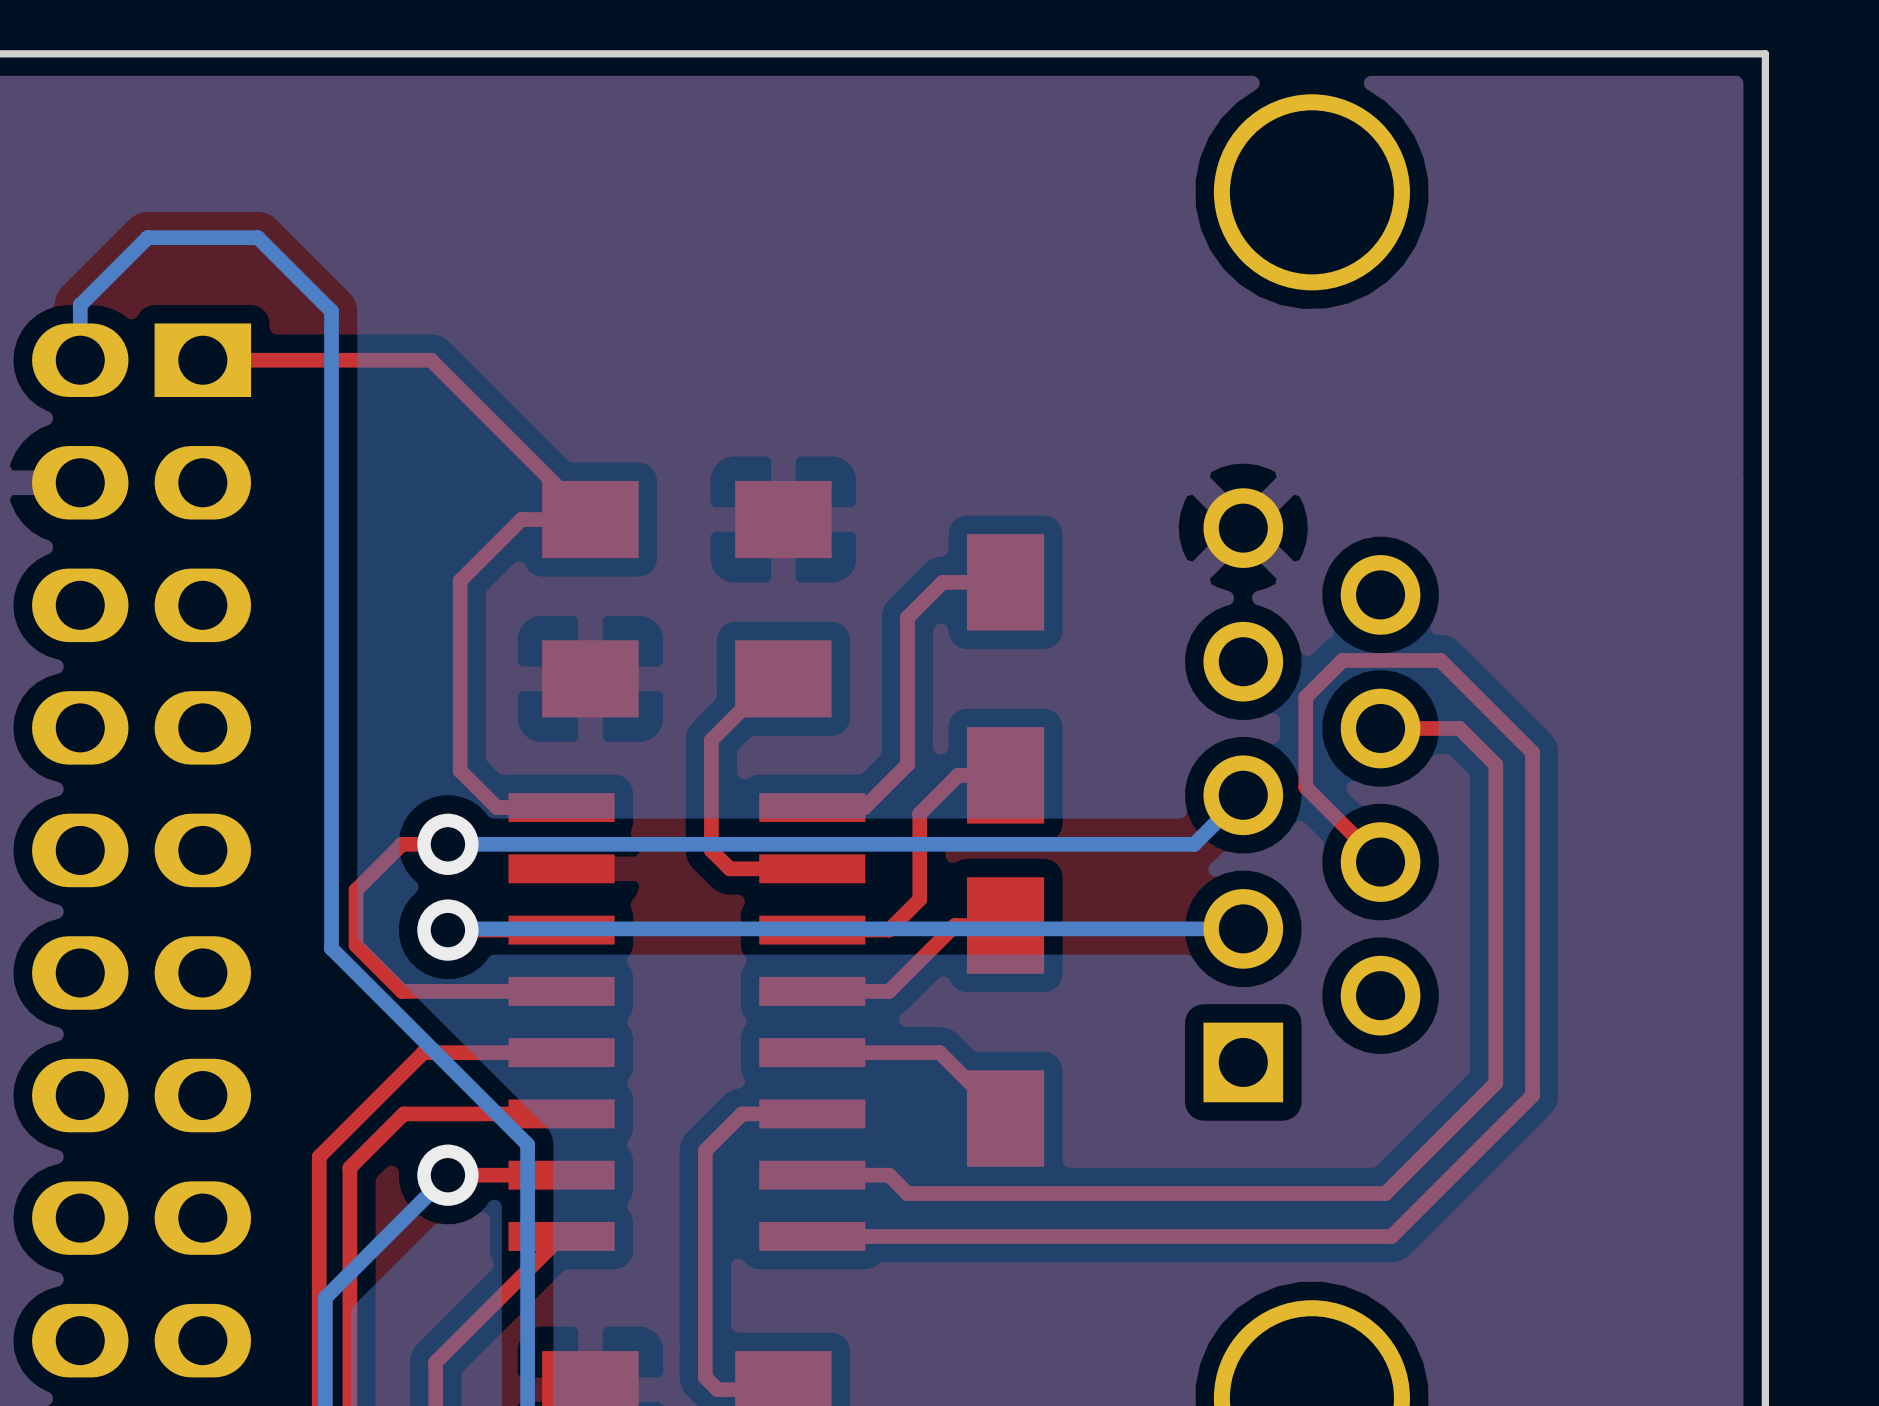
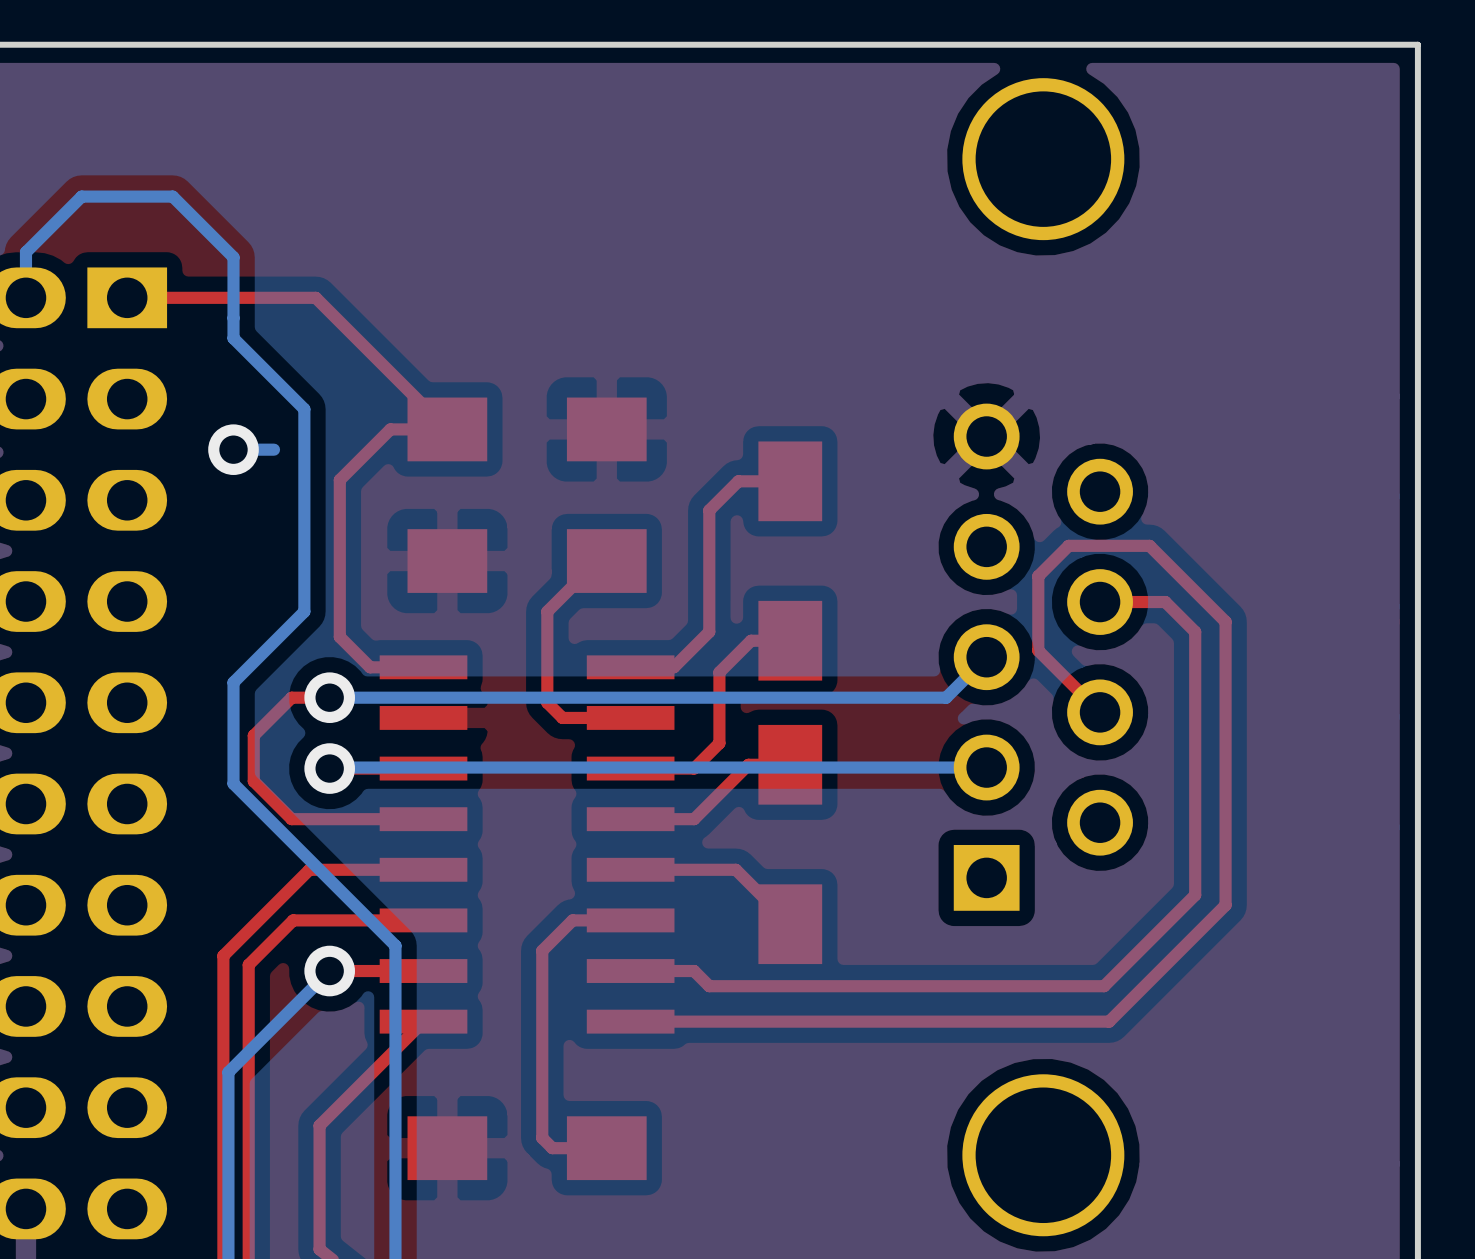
bottom track: (331, 409) (331, 825) -> (233, 338) (304, 409) (304, 611) (233, 682)
via: none -> (233, 449)
bottom track: none -> (274, 449) (233, 449)

